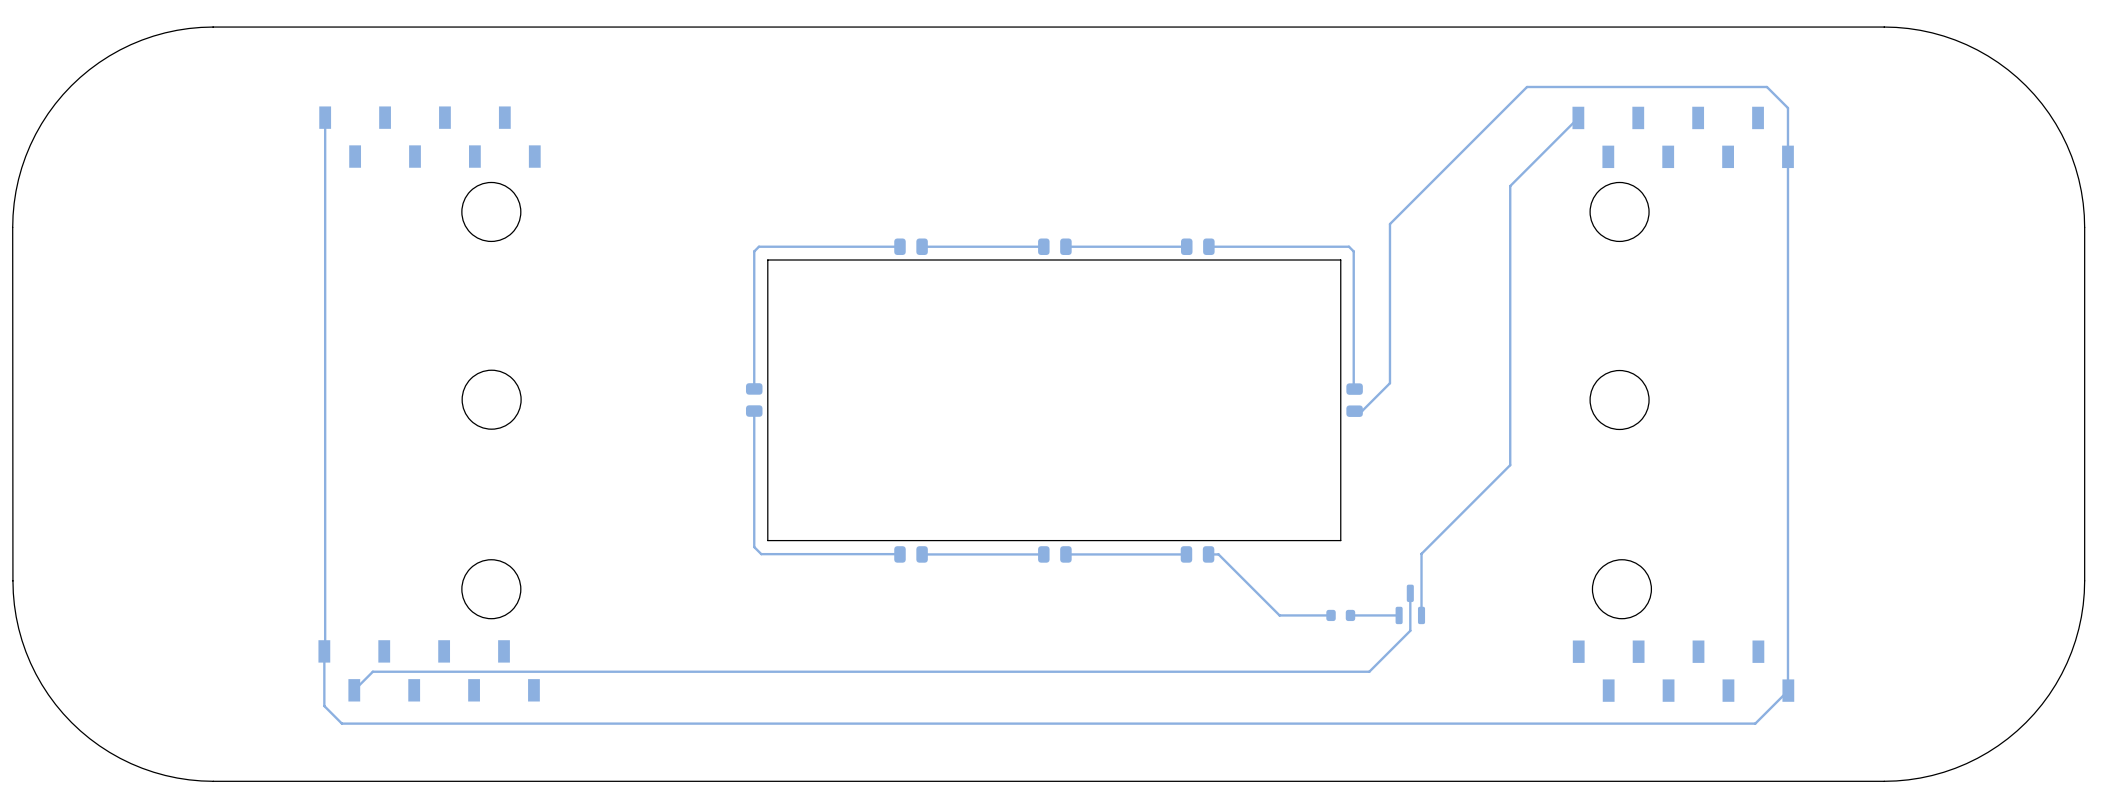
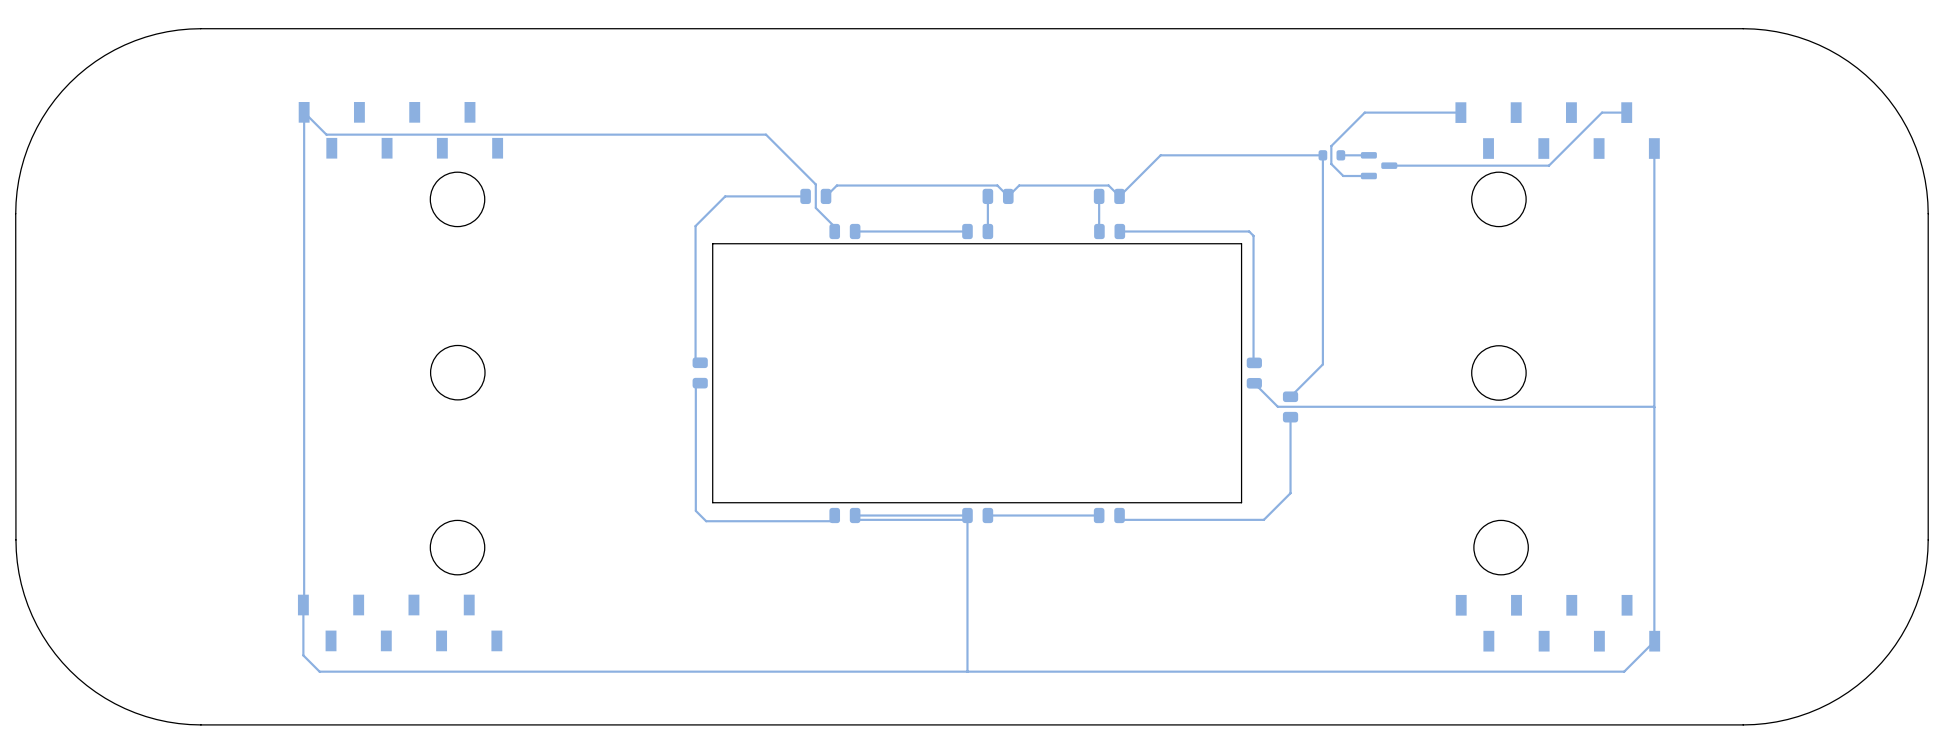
bottom track: none -> (304, 112) (326, 134) (766, 134) (815, 184) (815, 207) (834, 226)
bottom track: (1578, 117) (1510, 186) (1510, 465) (1421, 553) (1421, 615) -> (1460, 112) (1364, 112) (1331, 146) (1331, 164) (1343, 176) (1368, 176)
bottom track: none -> (1626, 112) (1602, 112) (1548, 165) (1389, 165)
bottom track: (1787, 156) (1787, 108) (1766, 86) (1527, 86) (1389, 224) (1389, 383) (1362, 411) (1353, 411) -> none
part: none -> (1331, 155)
bottom track: none -> (1340, 155) (1368, 155)
part: none -> (1379, 165)
bottom track: none -> (805, 196) (725, 196) (695, 226) (695, 362)
part: none -> (815, 196)
bottom track: none -> (826, 196) (836, 185) (997, 185) (1008, 196) (1019, 185) (1108, 185) (1119, 196) (1160, 155) (1322, 155) (1322, 364) (1290, 396)
bottom track: none -> (987, 196) (987, 226)
part: none -> (998, 196)
part: none -> (1109, 196)
bottom track: (899, 246) (758, 246) (754, 251) (754, 388) -> none
bottom track: (1065, 246) (1186, 246) -> (1099, 196) (1099, 231)
bottom track: none -> (695, 383) (695, 510) (706, 521) (834, 519)
bottom track: (754, 411) (754, 547) (761, 554) (899, 554) -> none
bottom track: none -> (1258, 383) (1258, 387) (1277, 406) (1654, 407)
part: none -> (1290, 406)
bottom track: none -> (1290, 417) (1290, 493) (1263, 519) (1119, 519)
bottom track: (1208, 554) (1218, 554) (1279, 615) (1331, 615) -> none
bottom track: none -> (855, 519) (967, 519) (967, 671)
bottom track: (1410, 593) (1410, 630) (1369, 671) (372, 671) (354, 690) -> none
part: (1410, 604) -> none
part: (1340, 615) -> none
bottom track: (1350, 615) (1399, 615) -> none

